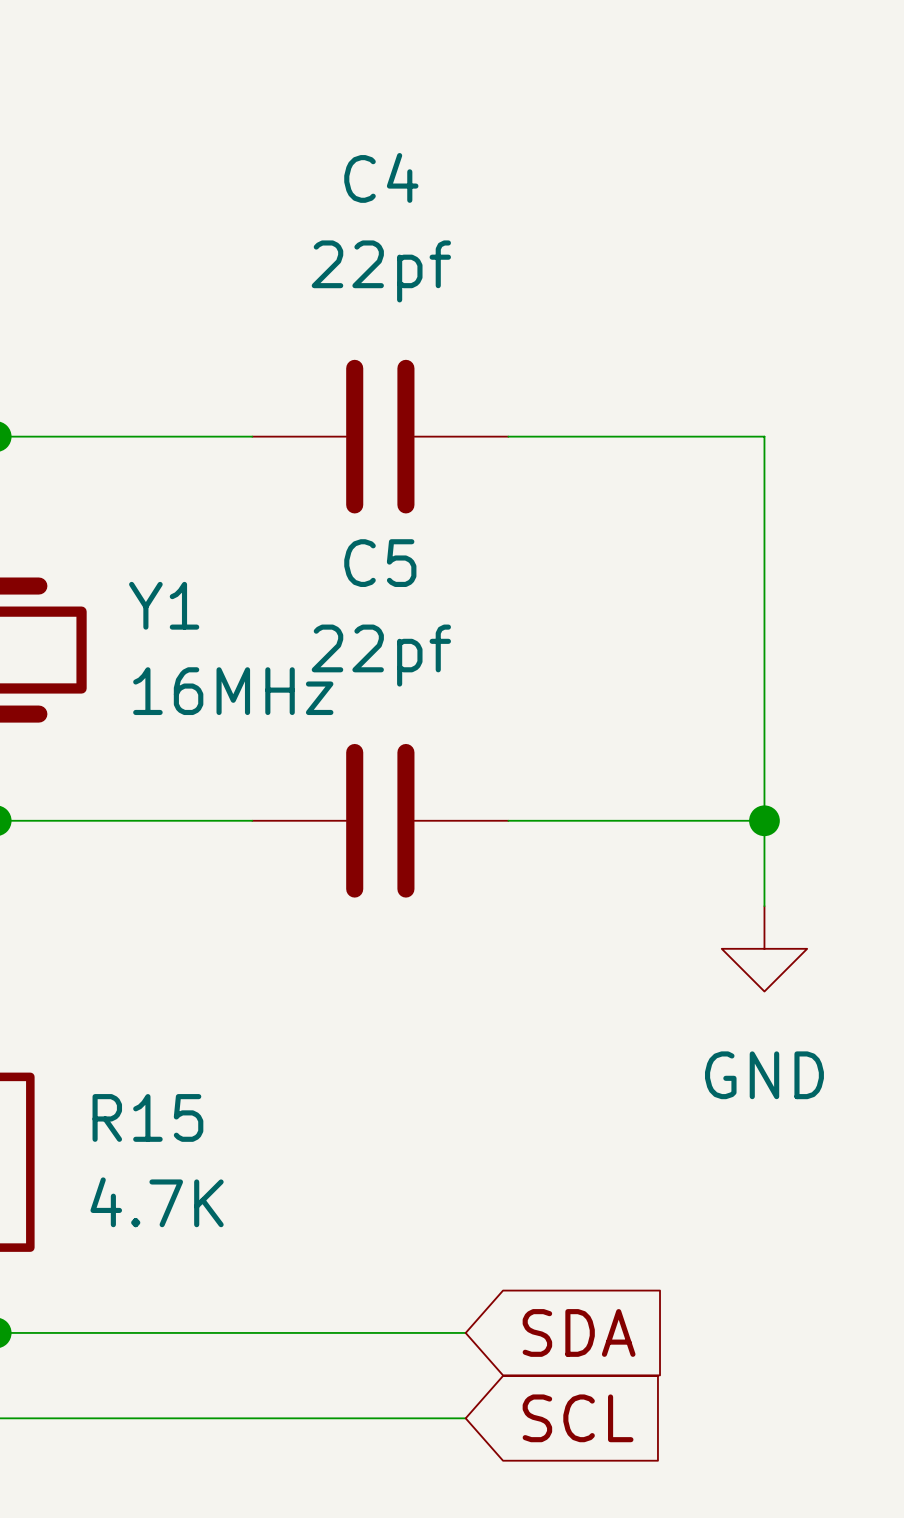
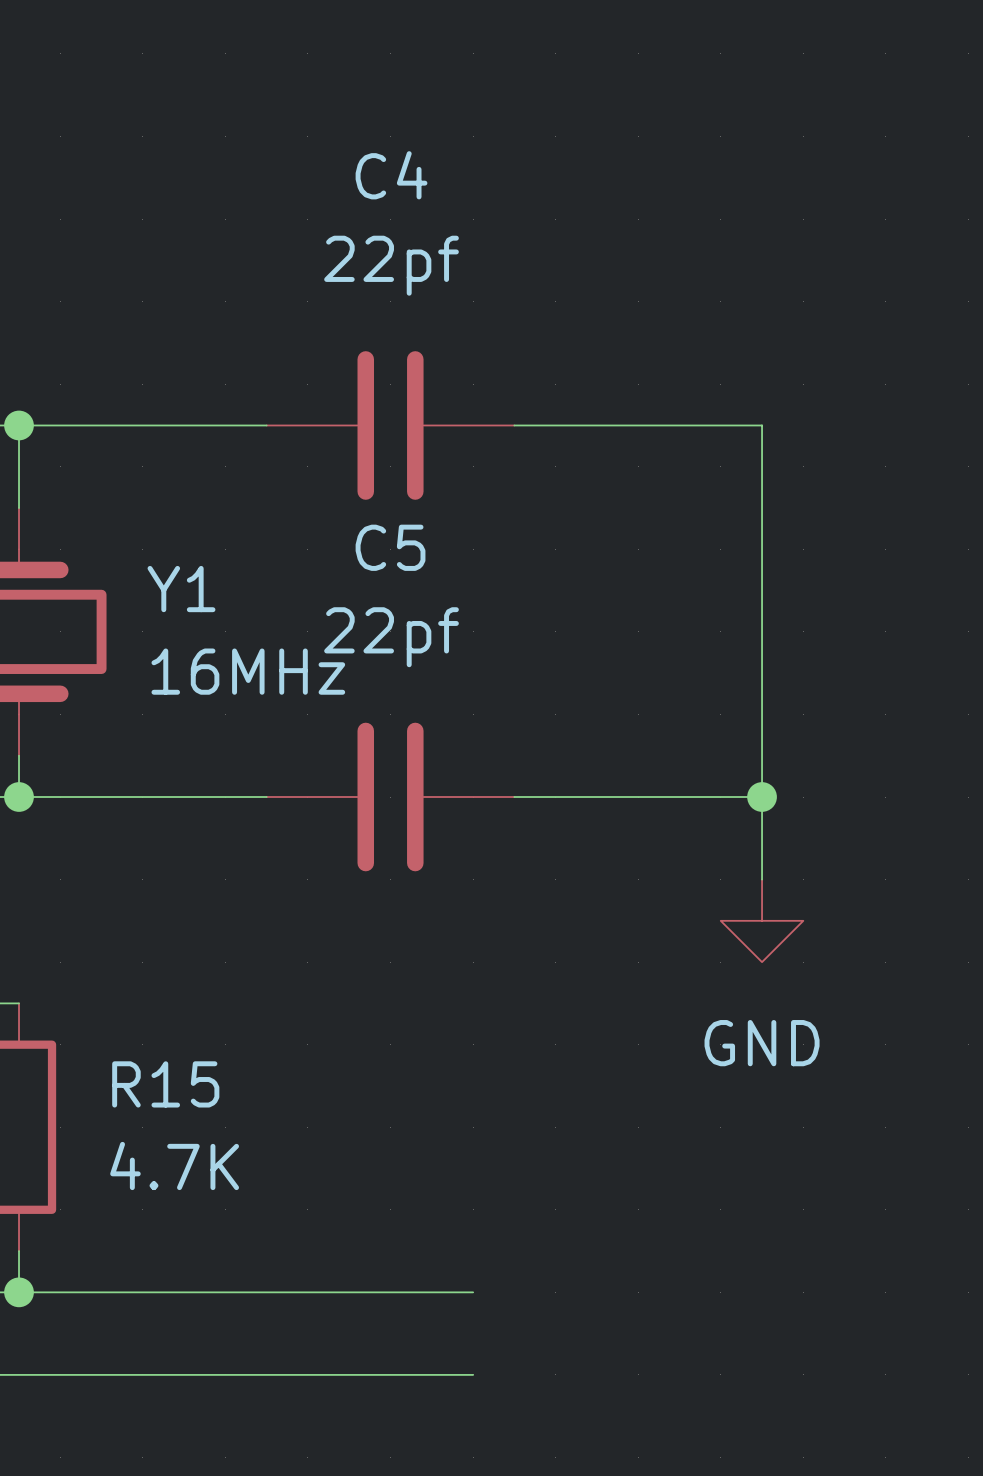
global label: SDA (579, 1332) -> none
global label: SCL (578, 1418) -> none

